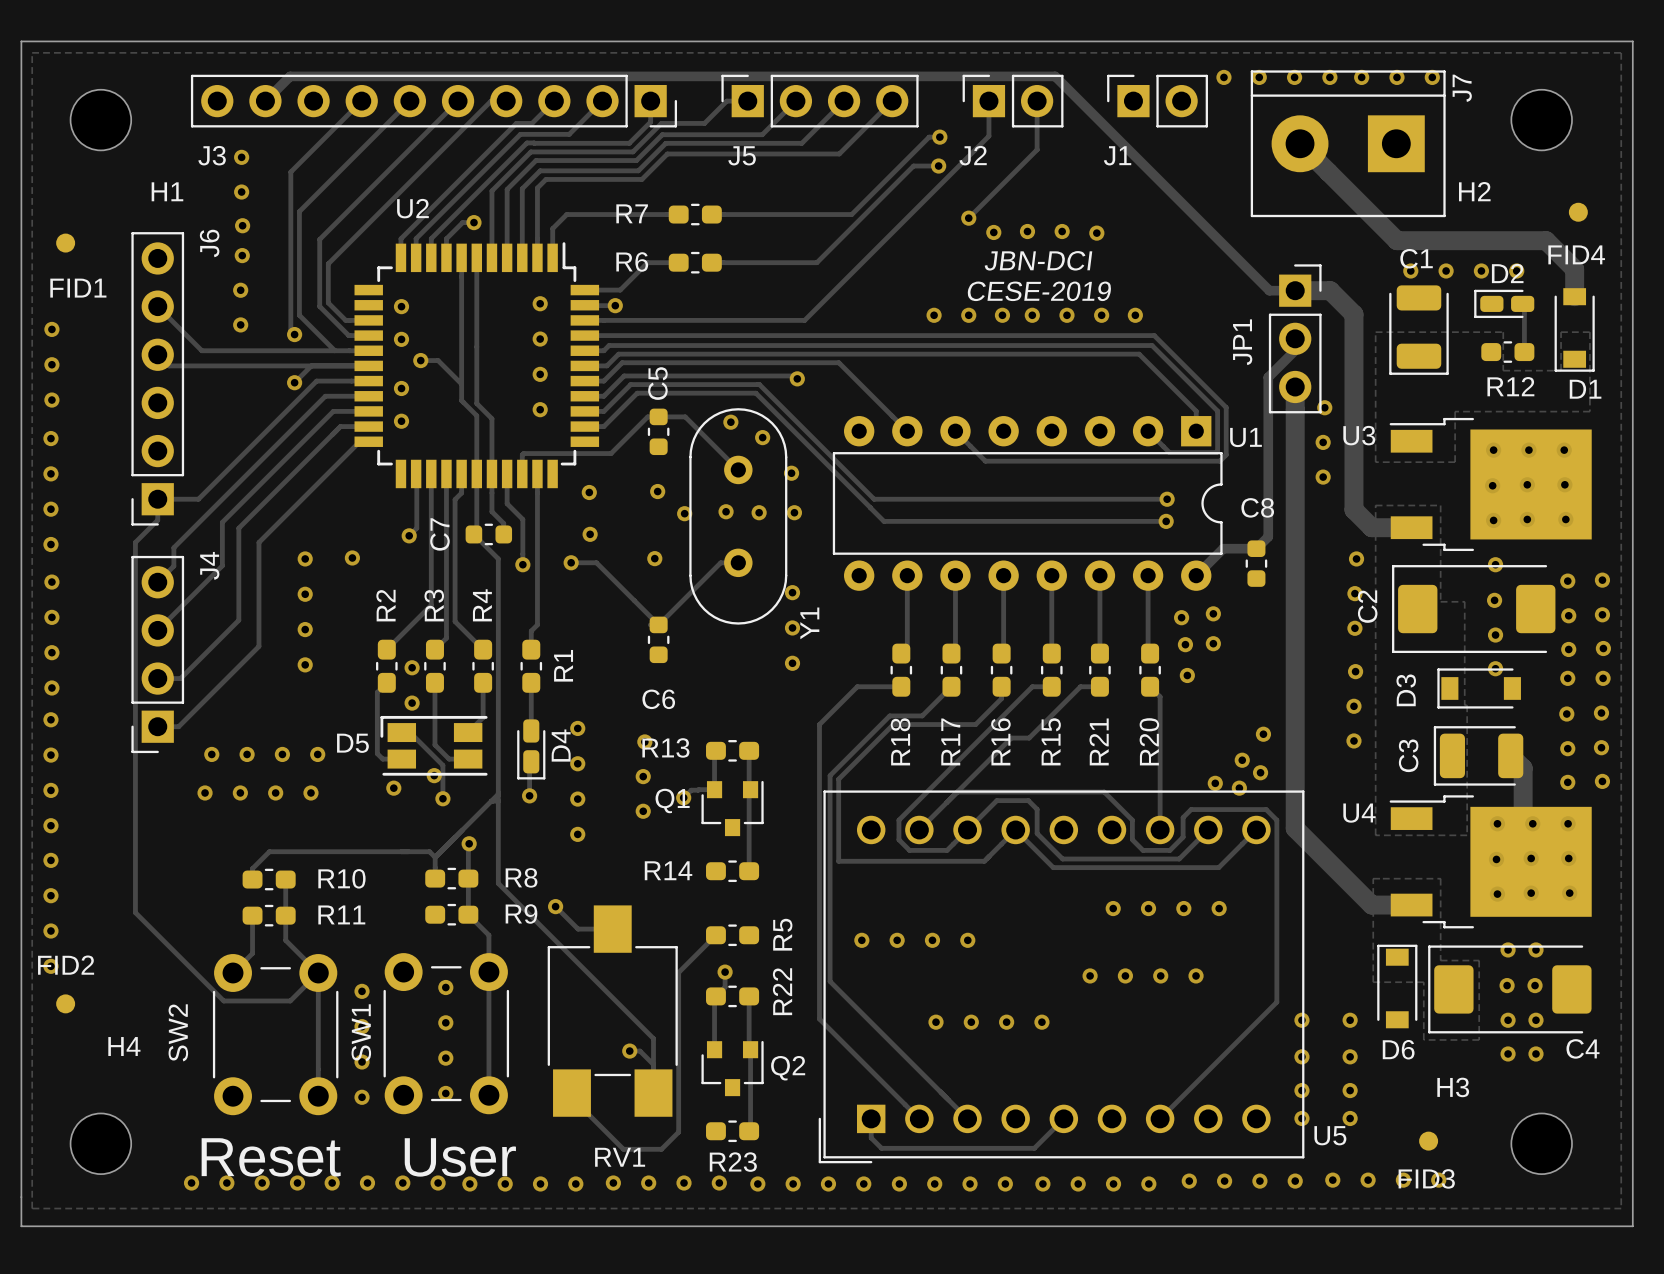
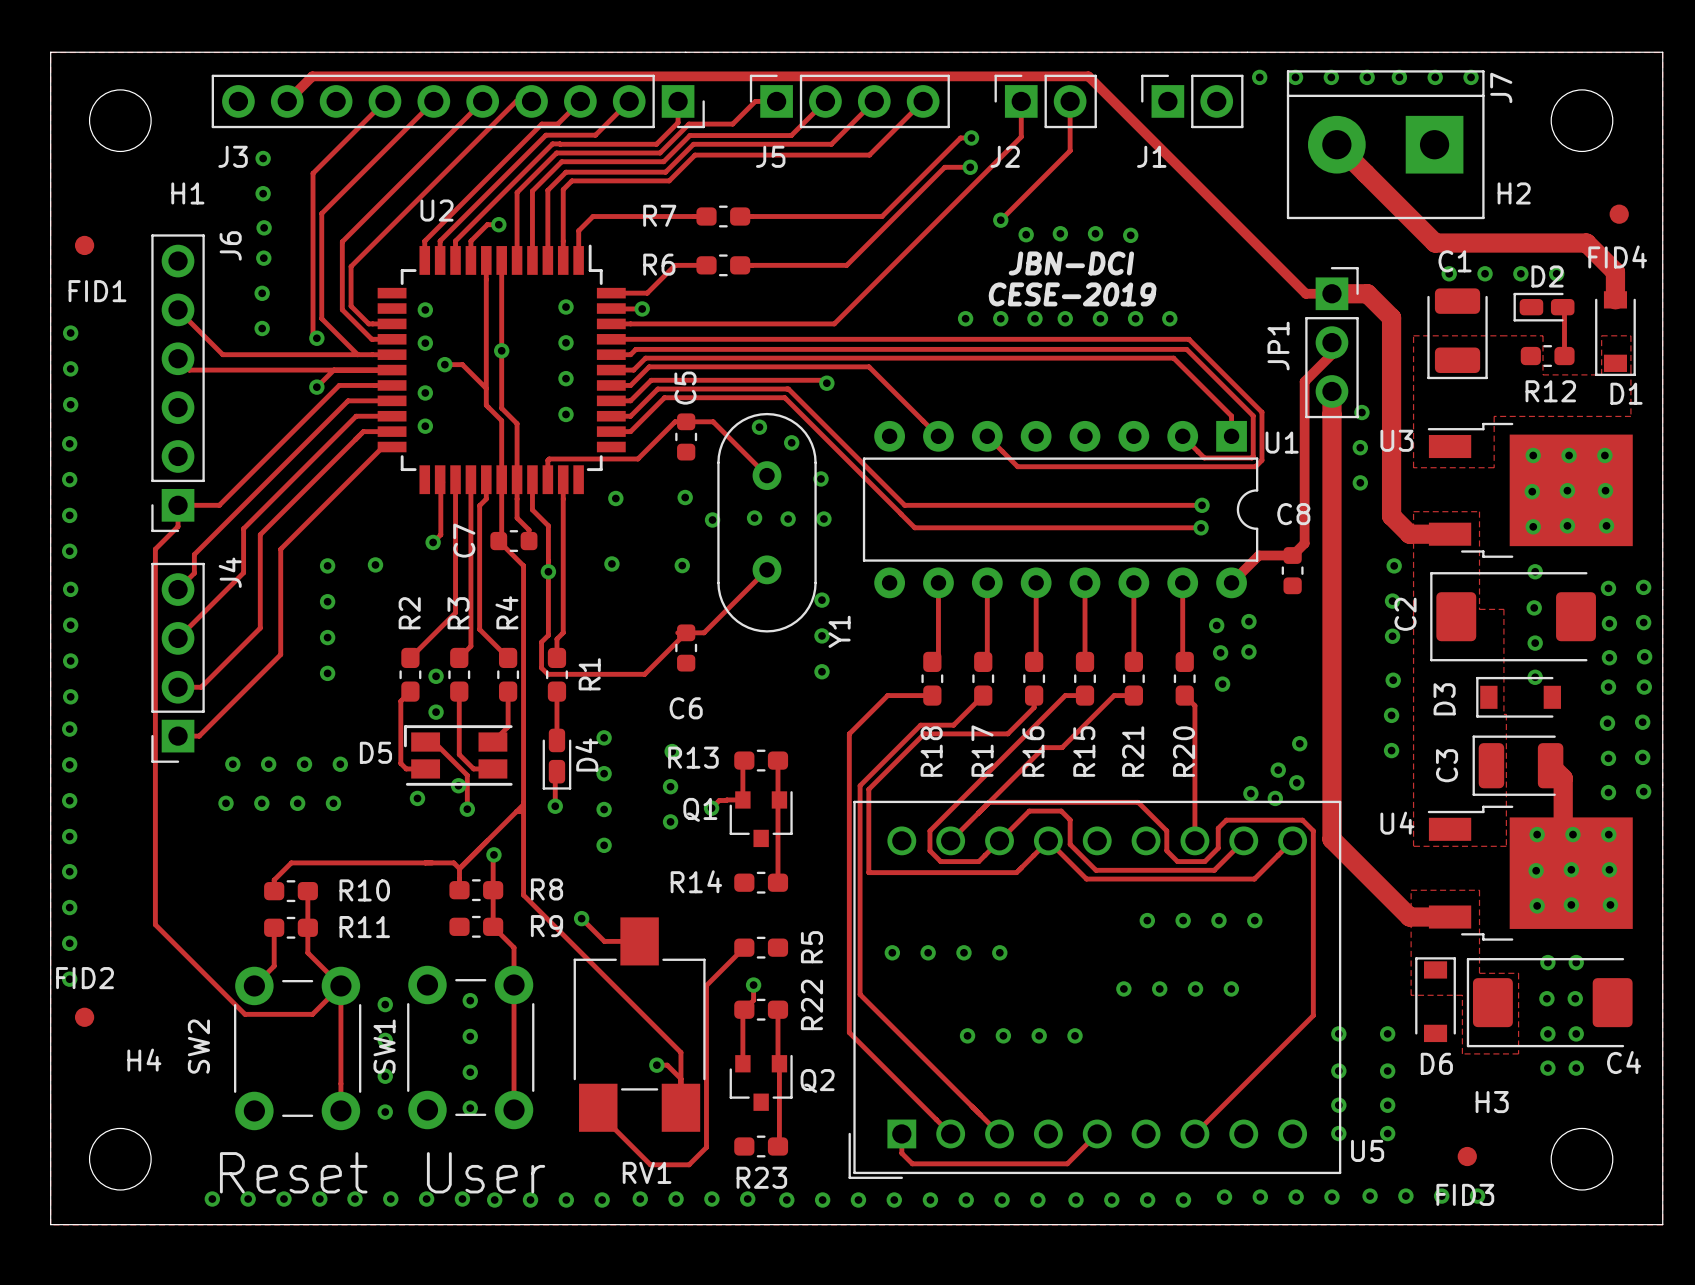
board edge: (21, 41) (21, 1226) (1632, 1226) (1632, 41) (21, 41) -> (50, 52) (50, 1224) (1662, 1224) (1662, 52) (50, 52)
via: none -> (501, 350)
via: (590, 534) -> none
track: (571, 562) (596, 562) (658, 624) (720, 562) (738, 562) -> (548, 571) (548, 635) (541, 642) (541, 667) (547, 674) (644, 674) (686, 632) (704, 632) (767, 569)
via position: (571, 562) -> (611, 563)

